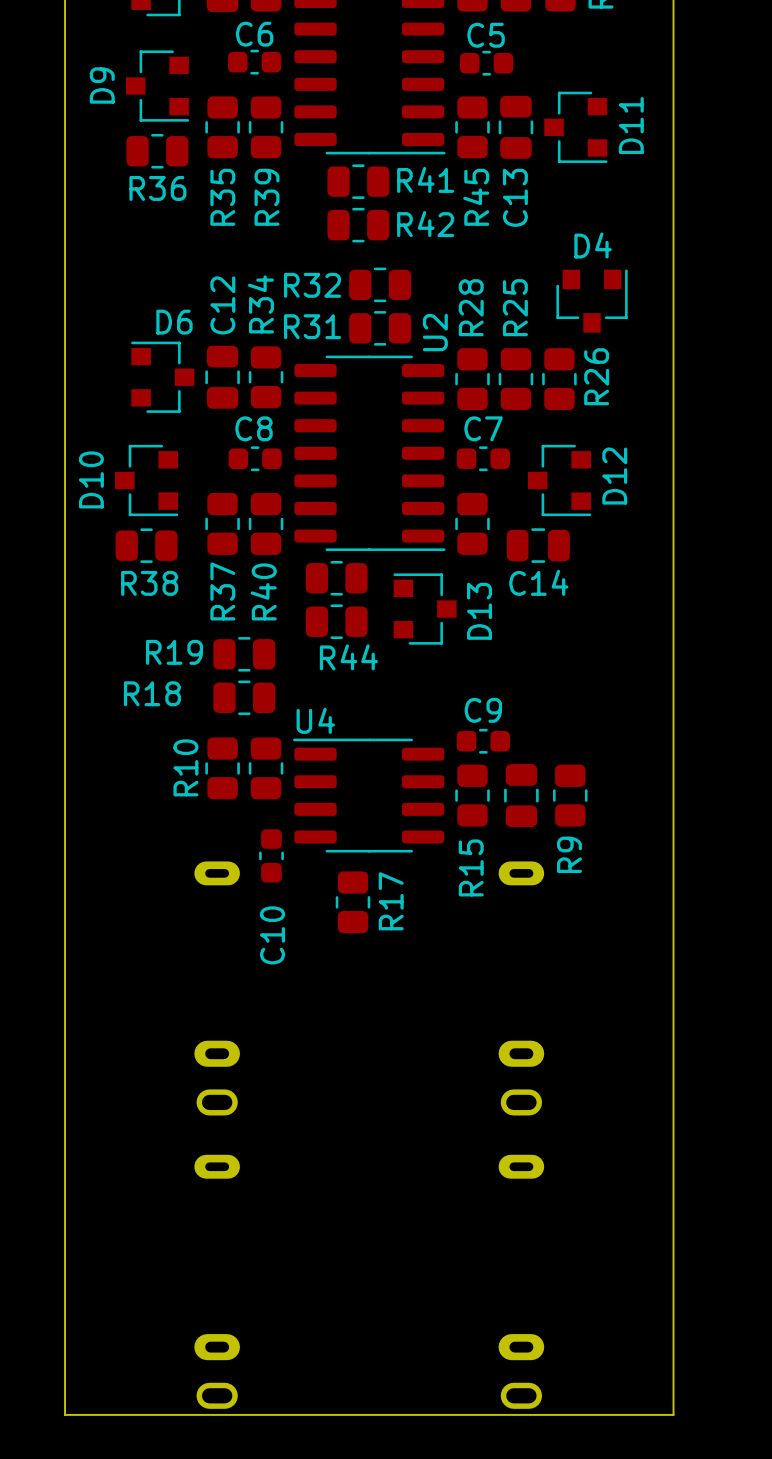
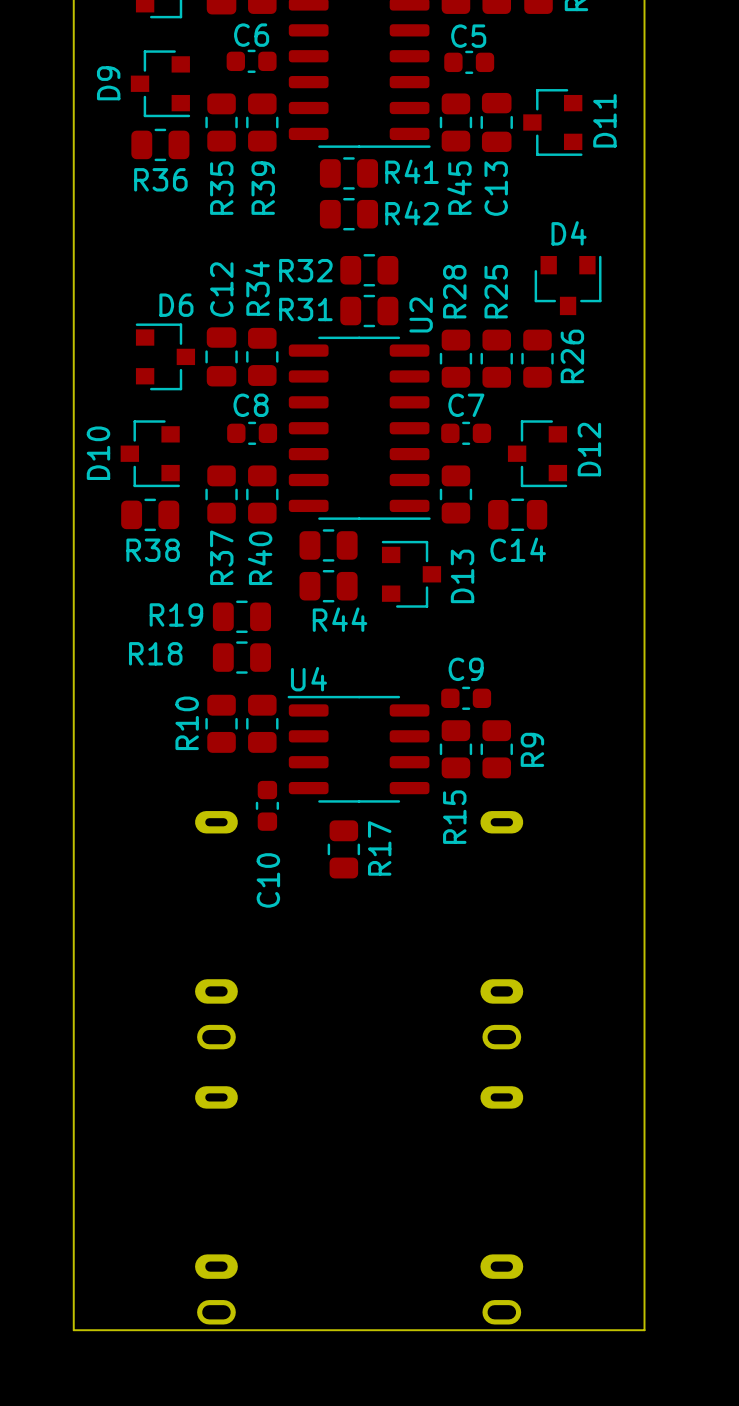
part: (521, 795) -> none
R9 position: (570, 795) -> (496, 749)
R9 name position: R9 (569, 854) -> R9 (532, 749)

